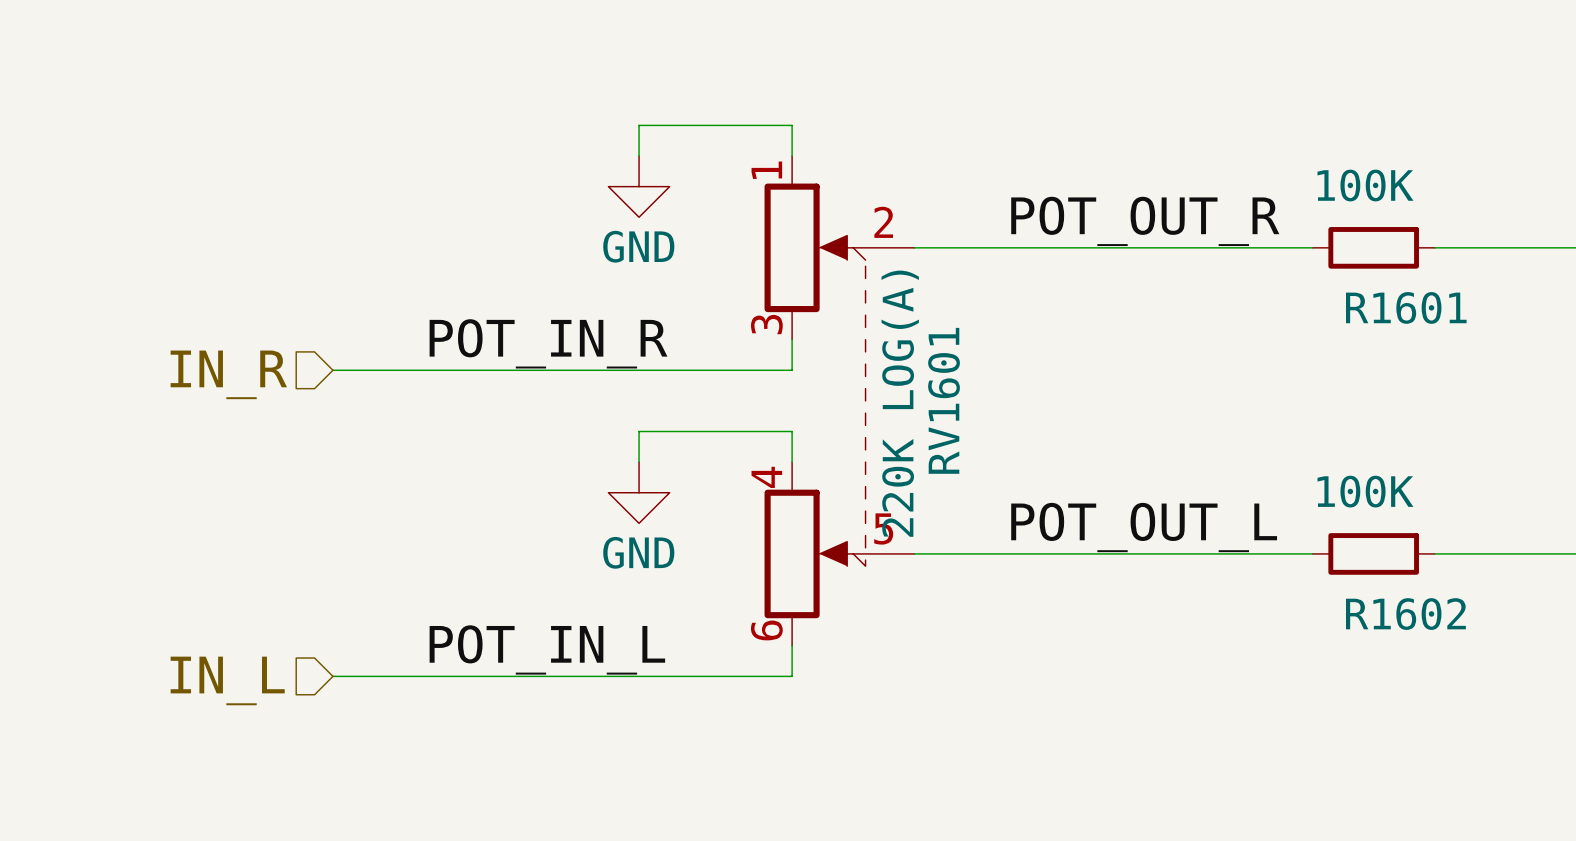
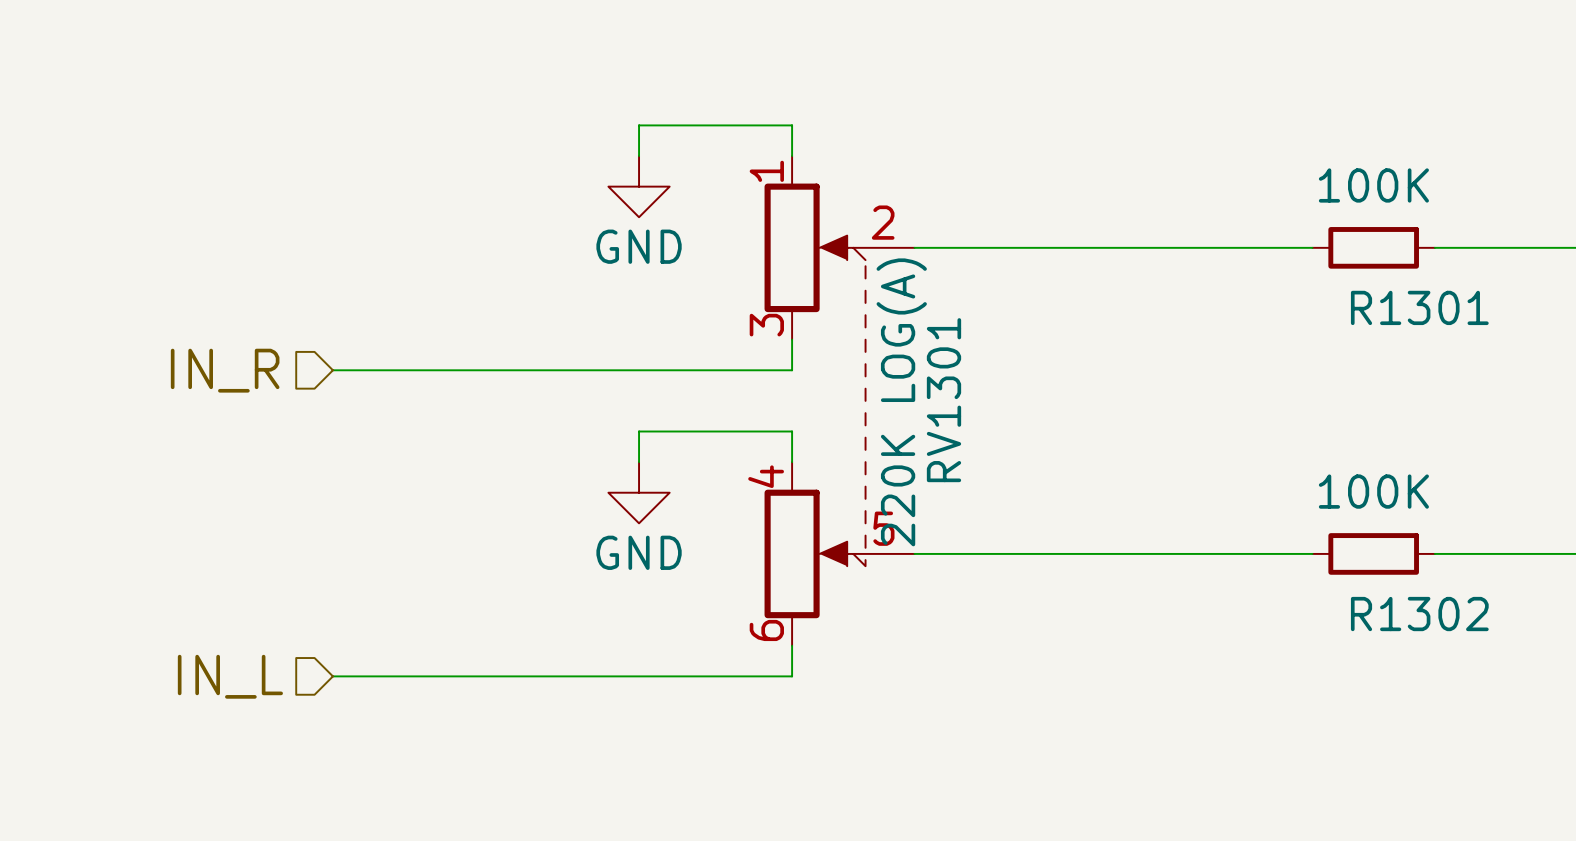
label: POT_OUT_R (1145, 221) -> none
R1601 name: R1601 (1406, 307) -> R1301 (1419, 307)
label: POT_IN_R (548, 343) -> none
RV1601 name: RV1601 (944, 400) -> RV1301 (943, 400)
label: POT_OUT_L (1144, 527) -> none
R1602 name: R1602 (1405, 614) -> R1302 (1419, 614)
label: POT_IN_L (547, 649) -> none

